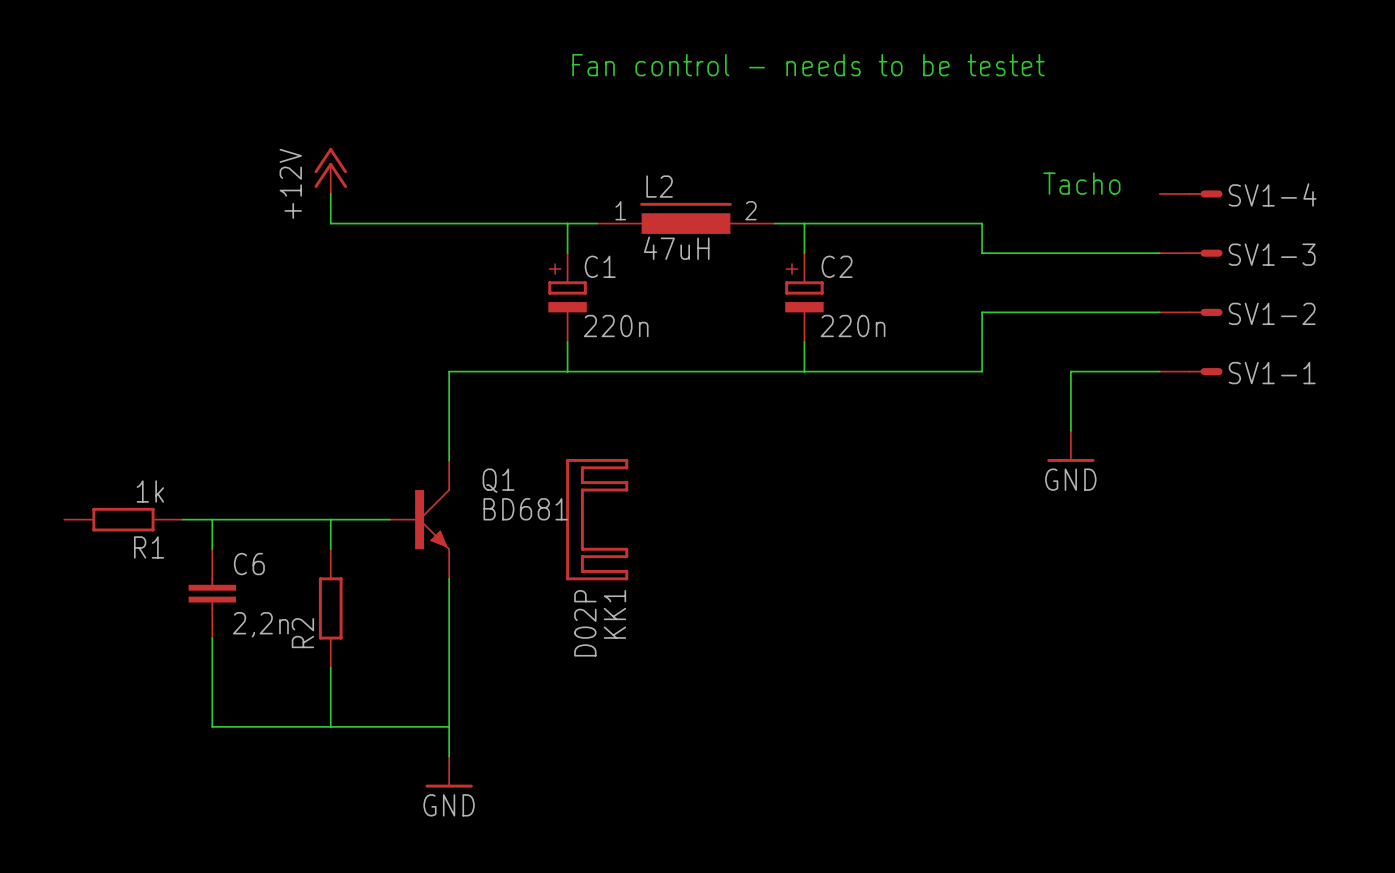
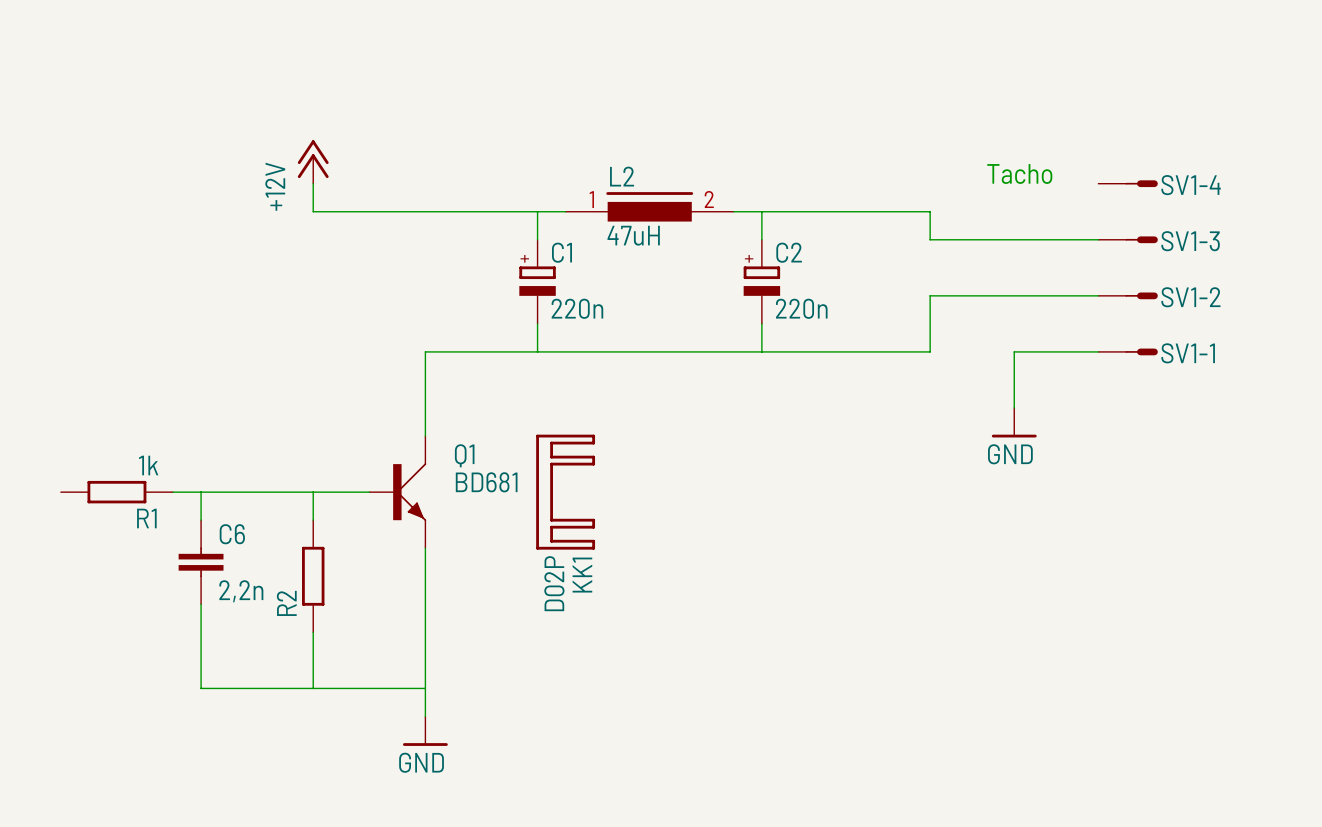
text: Fan control - needs to be testet (808, 65) -> none

